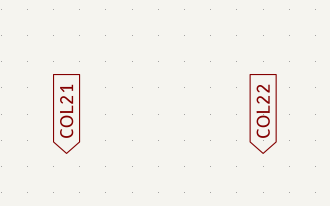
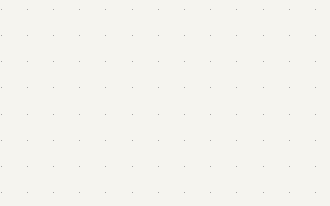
global label: COL21 (66, 111) -> none
global label: COL22 (263, 111) -> none

